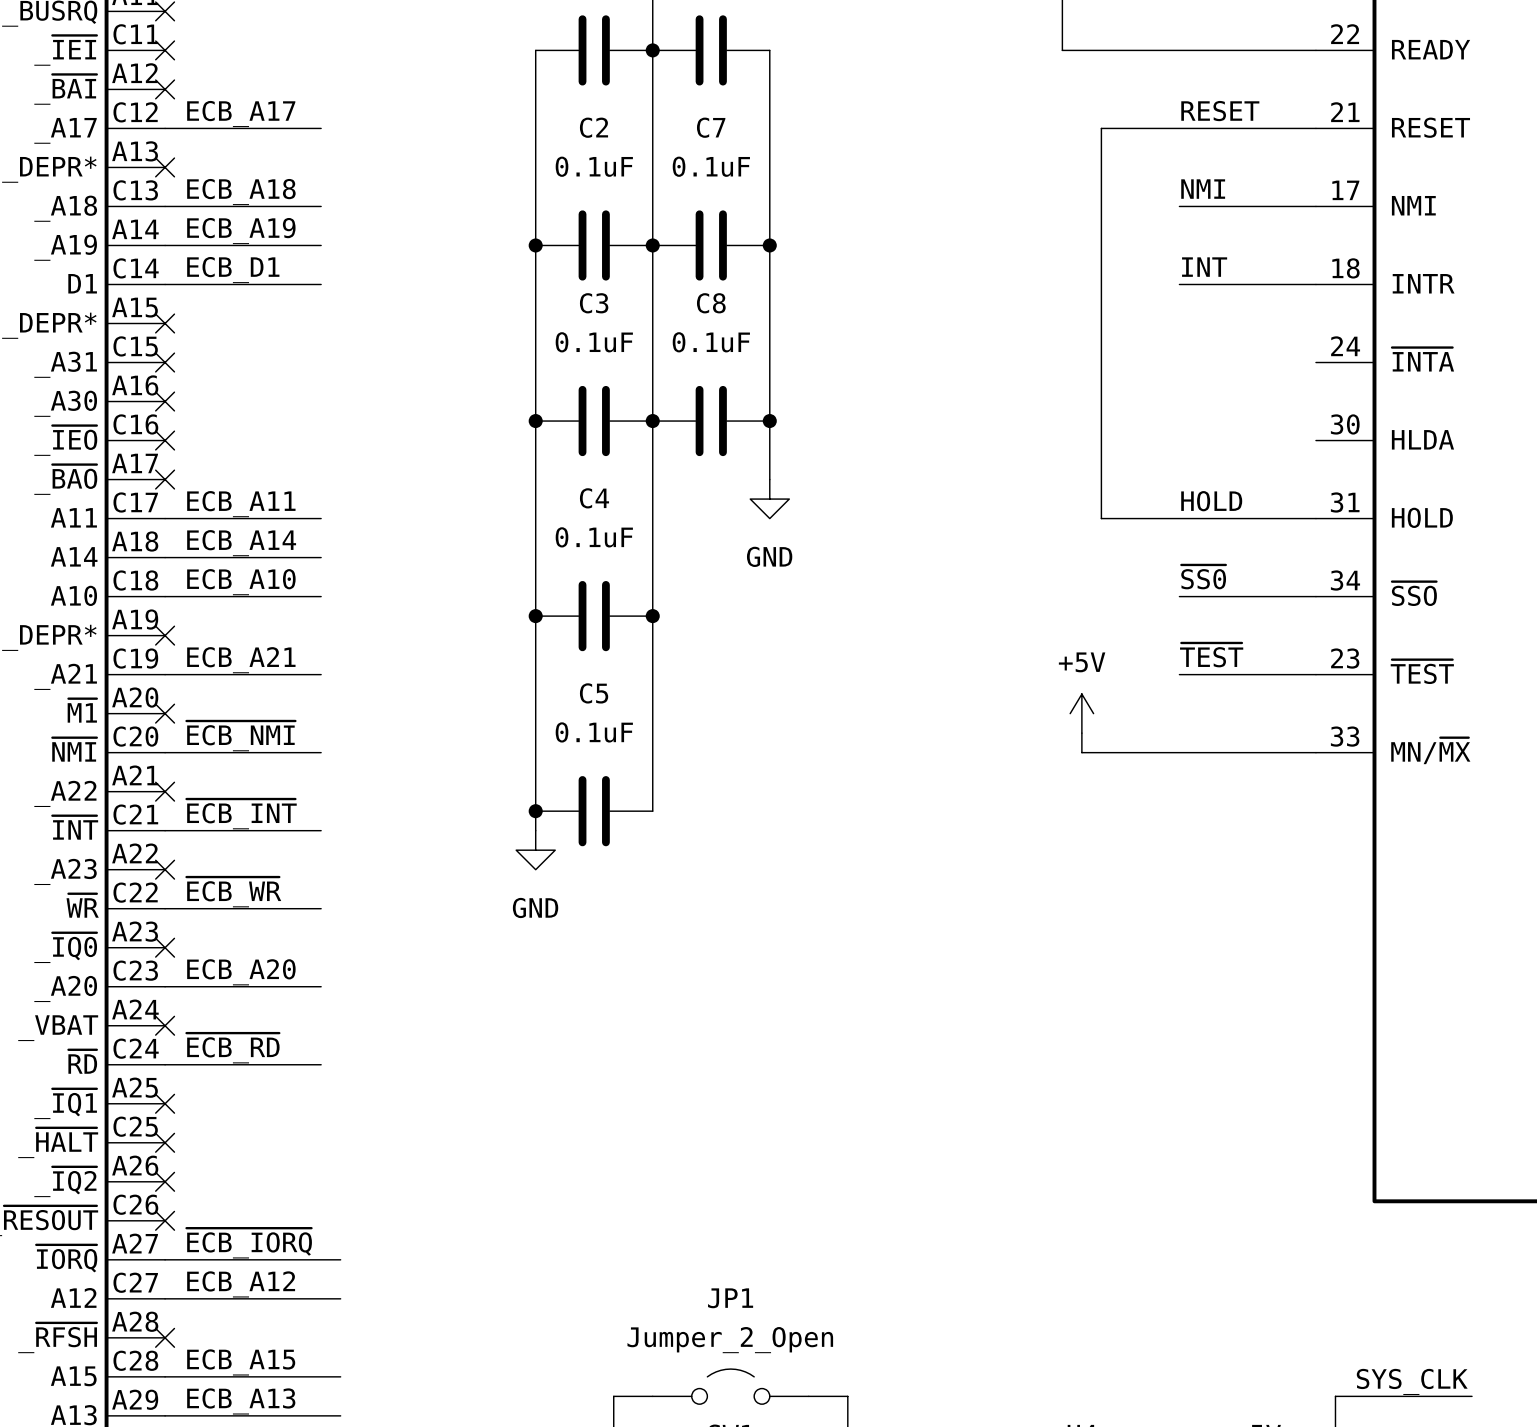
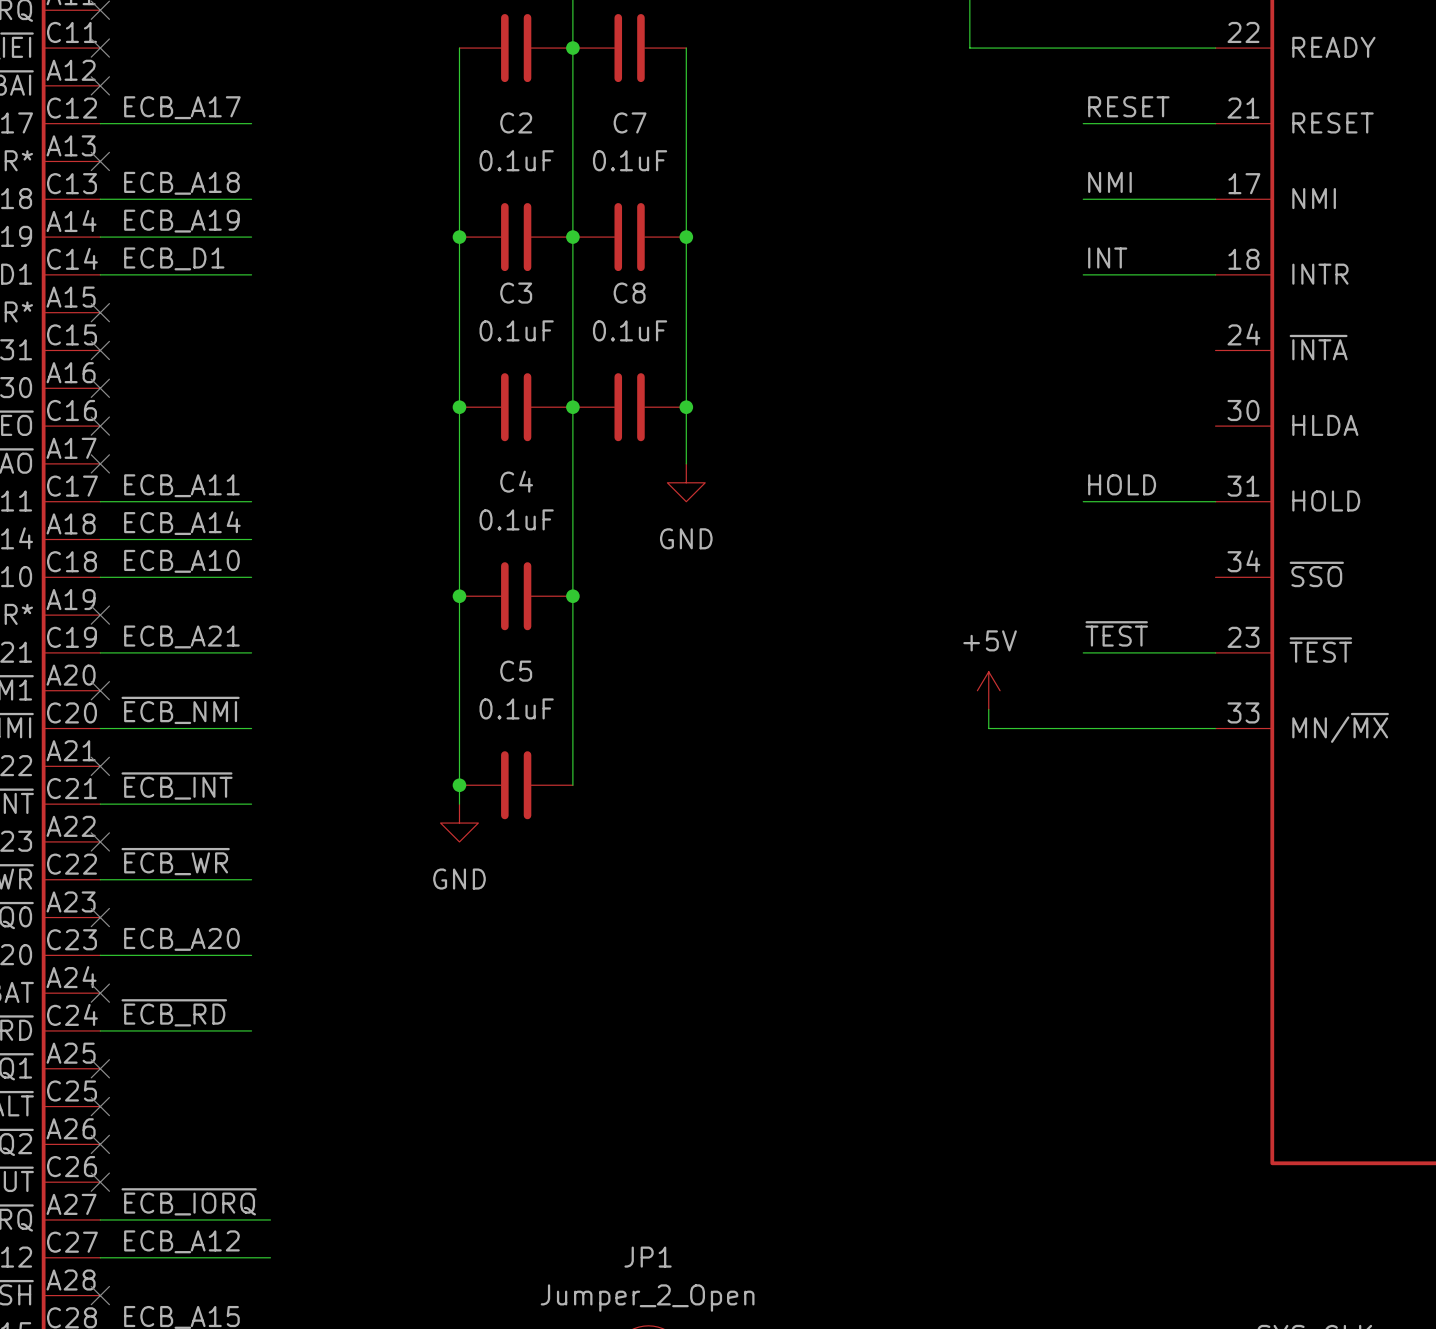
wire: (1179, 128) (1101, 128) (1101, 518) (1179, 518) -> none
label: ~{SS0} (1203, 577) -> none
wire: (1179, 596) (1315, 596) -> none

